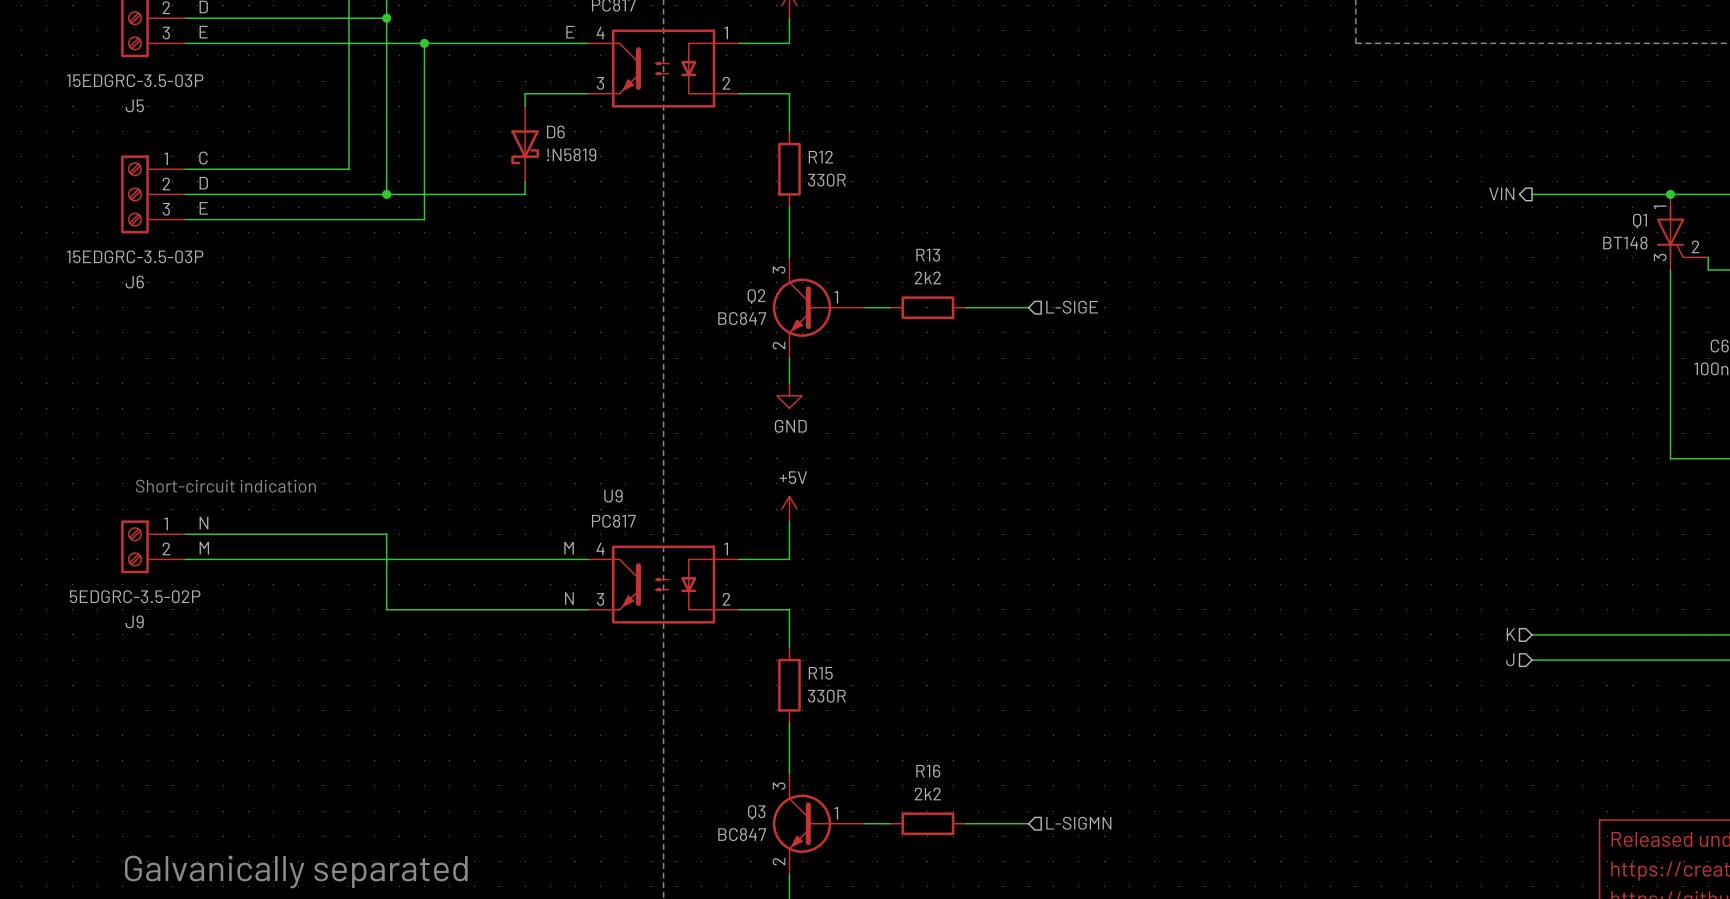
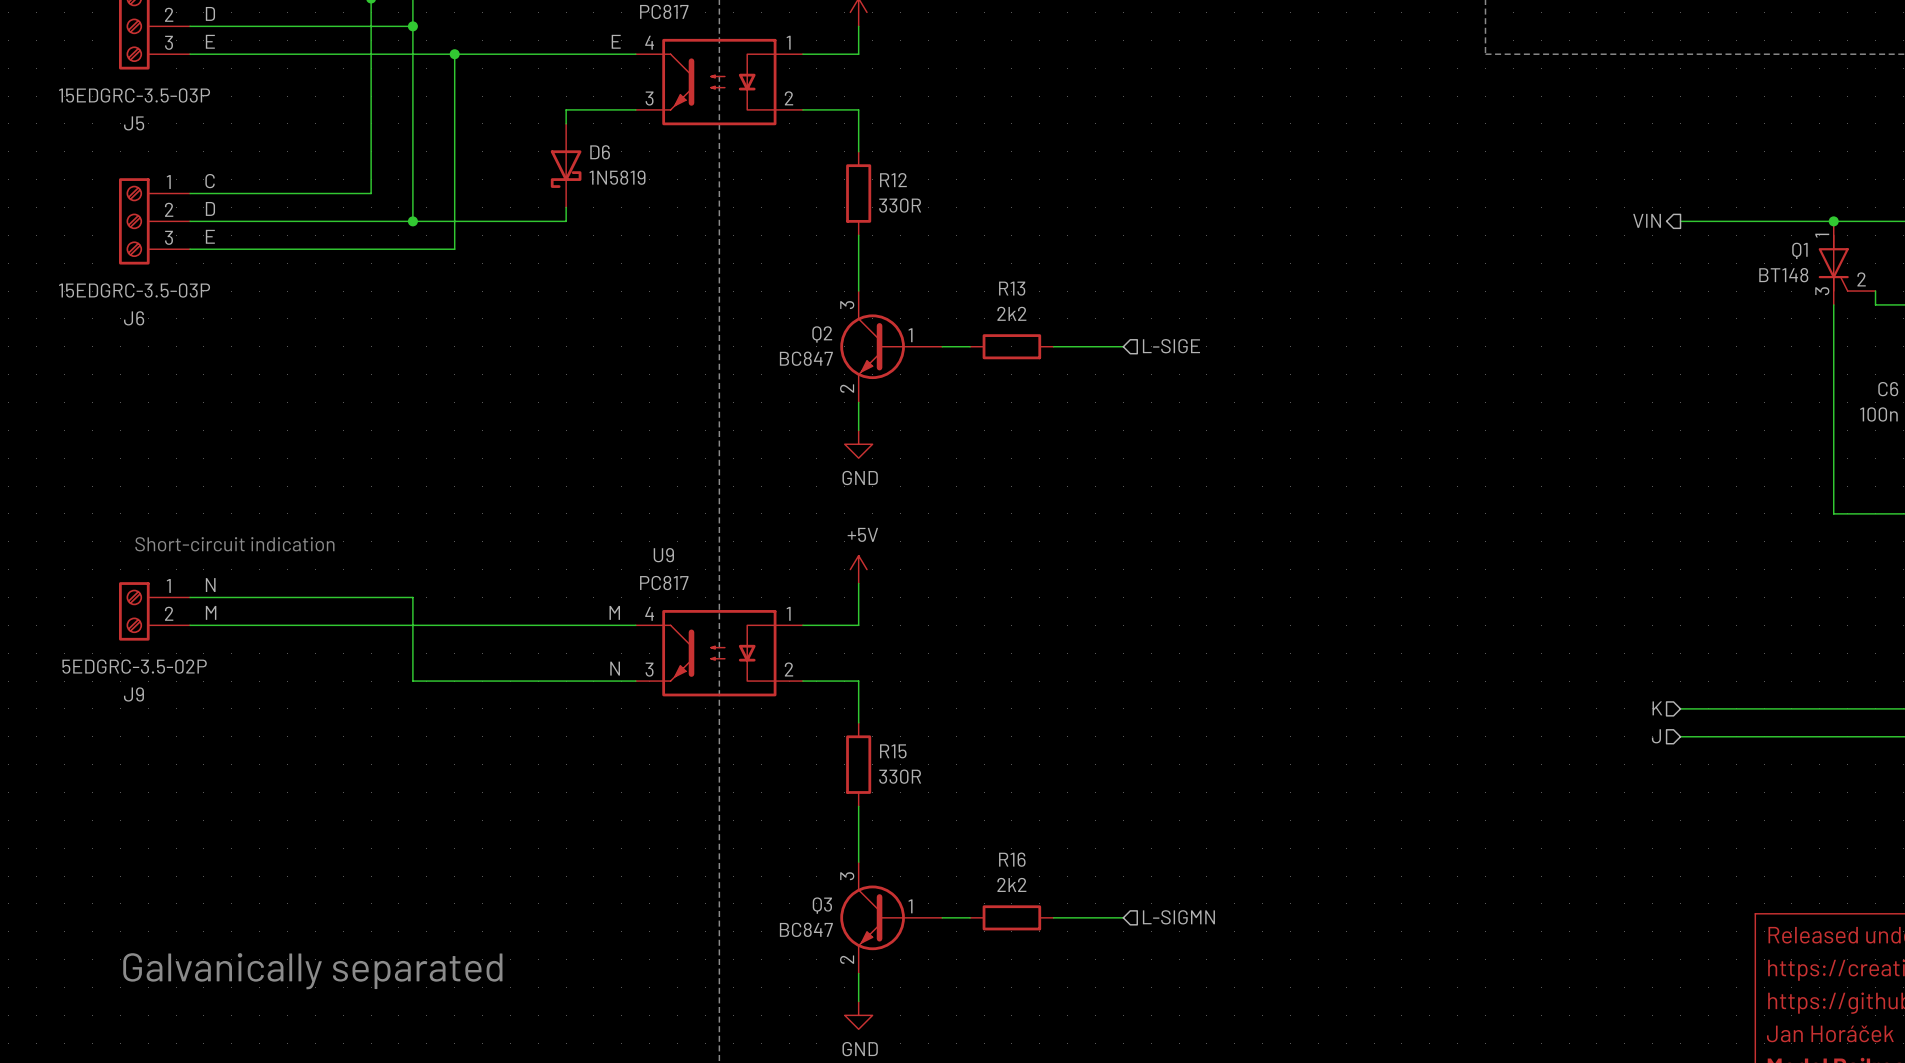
D6 value: !N5819 (571, 154) -> 1N5819 (617, 177)

